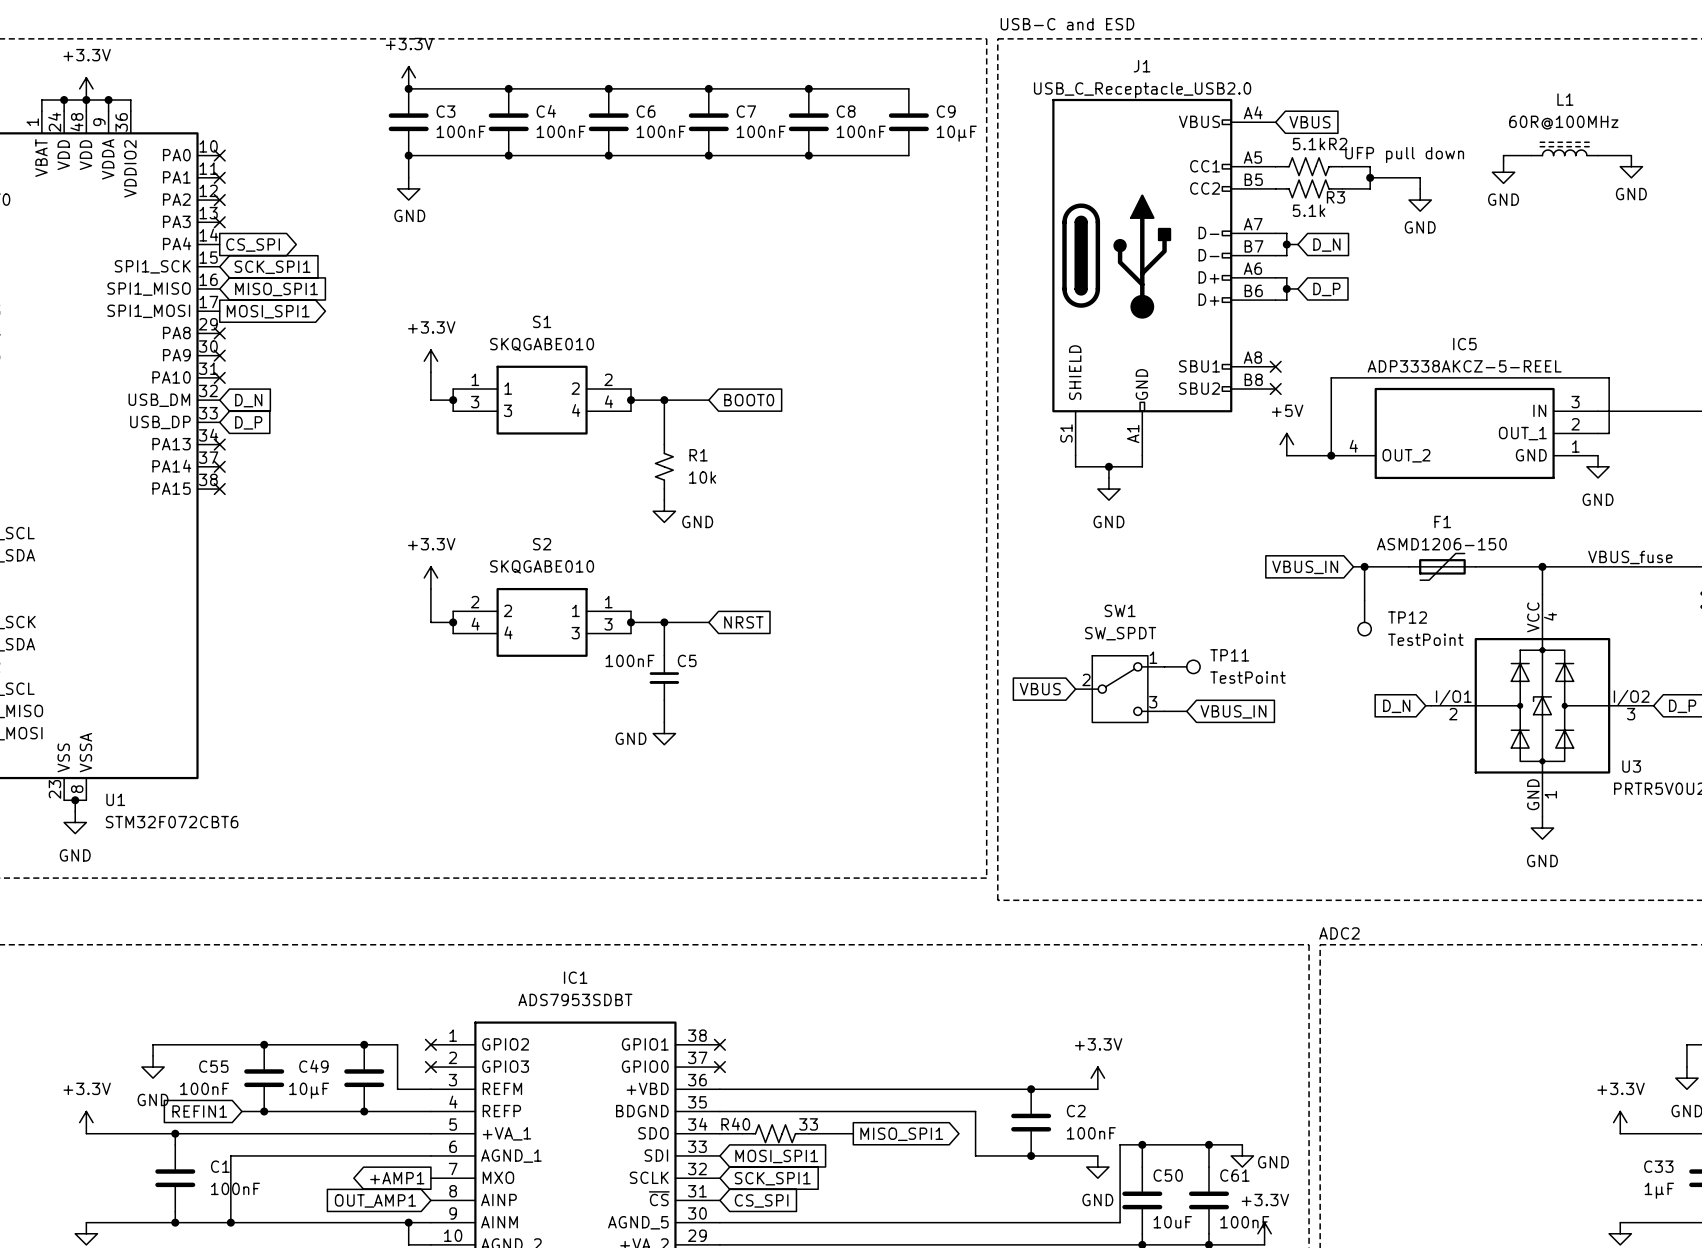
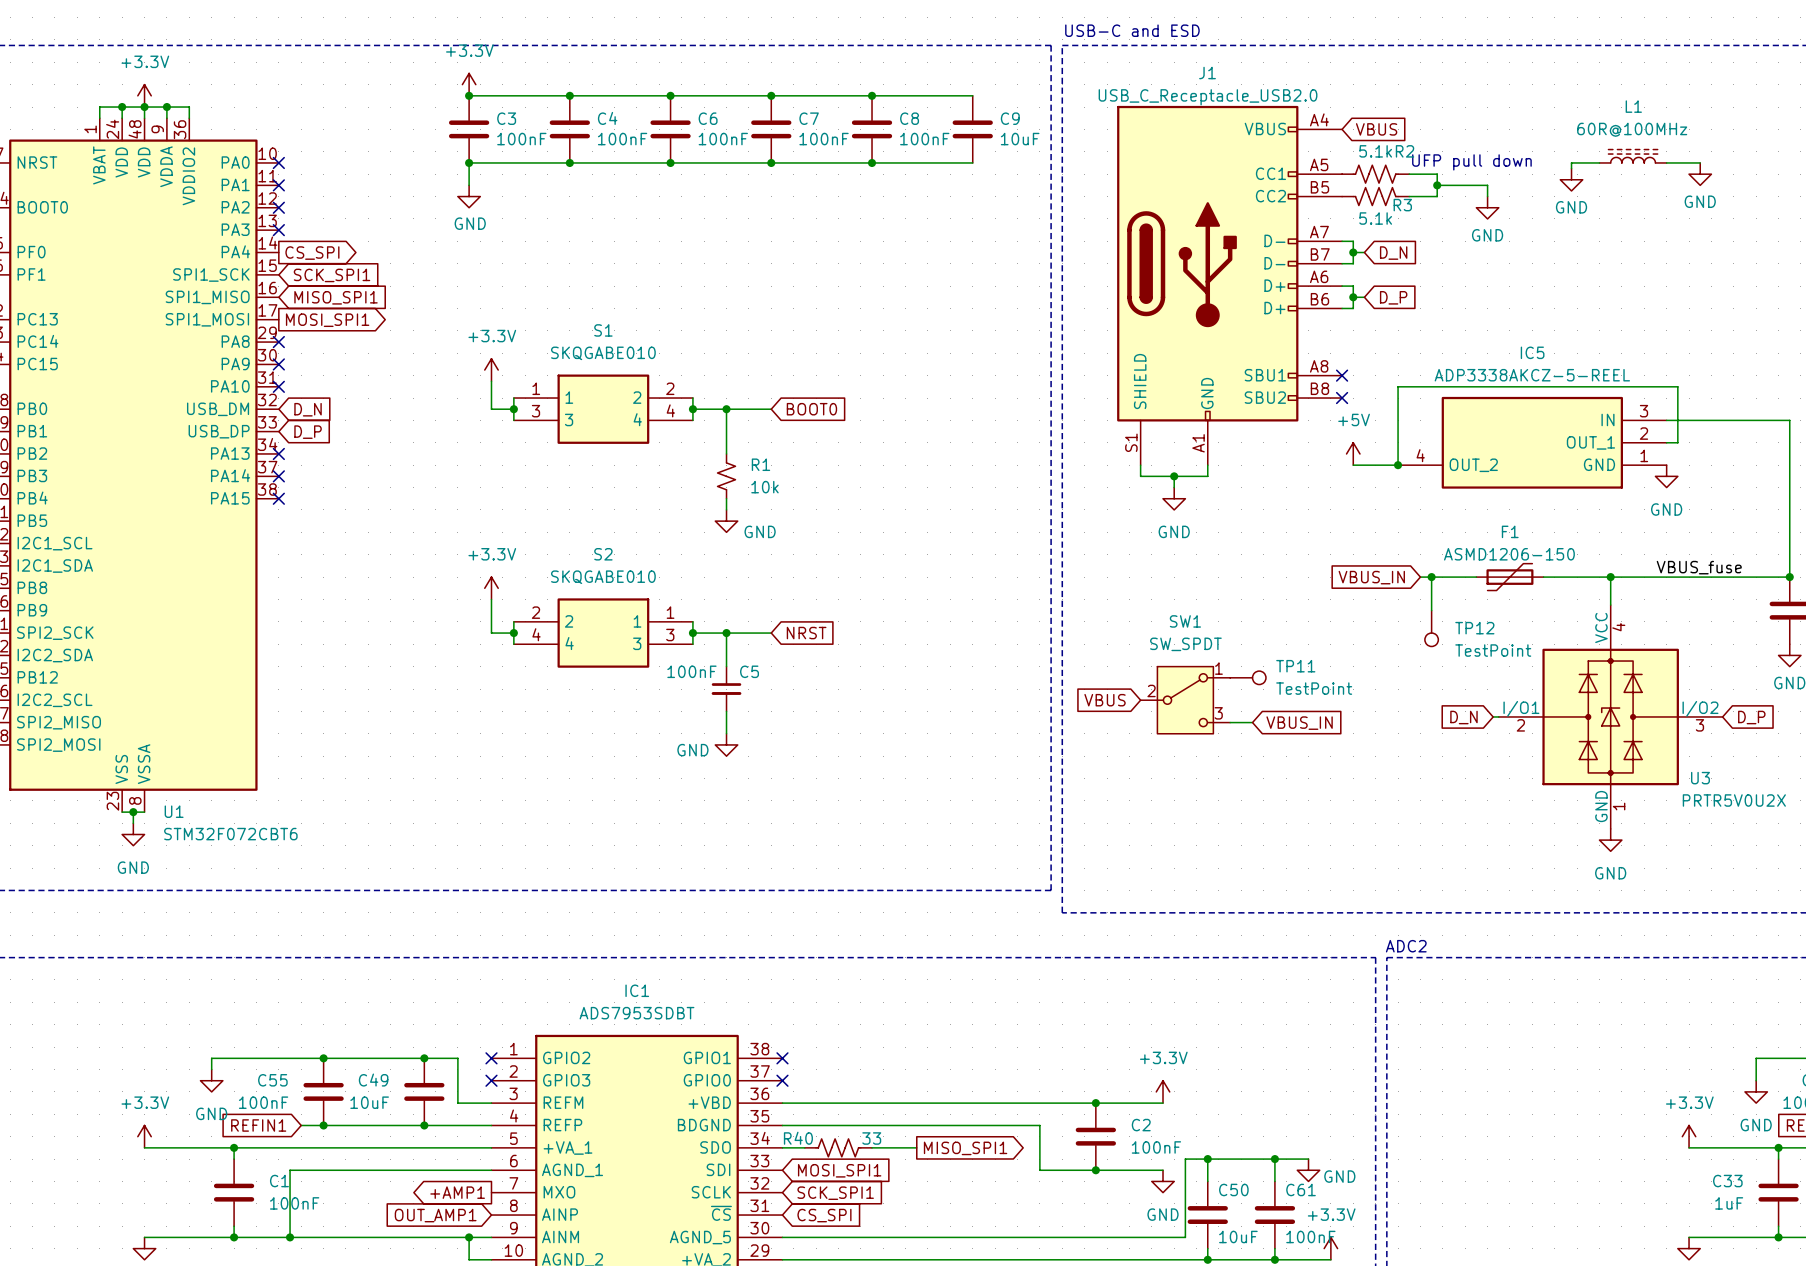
C9 value: 10µF (956, 133) -> 10uF (1020, 139)
C49 value: 10µF (309, 1090) -> 10uF (369, 1102)
C33 value: 1µF (1659, 1190) -> 1uF (1729, 1203)

